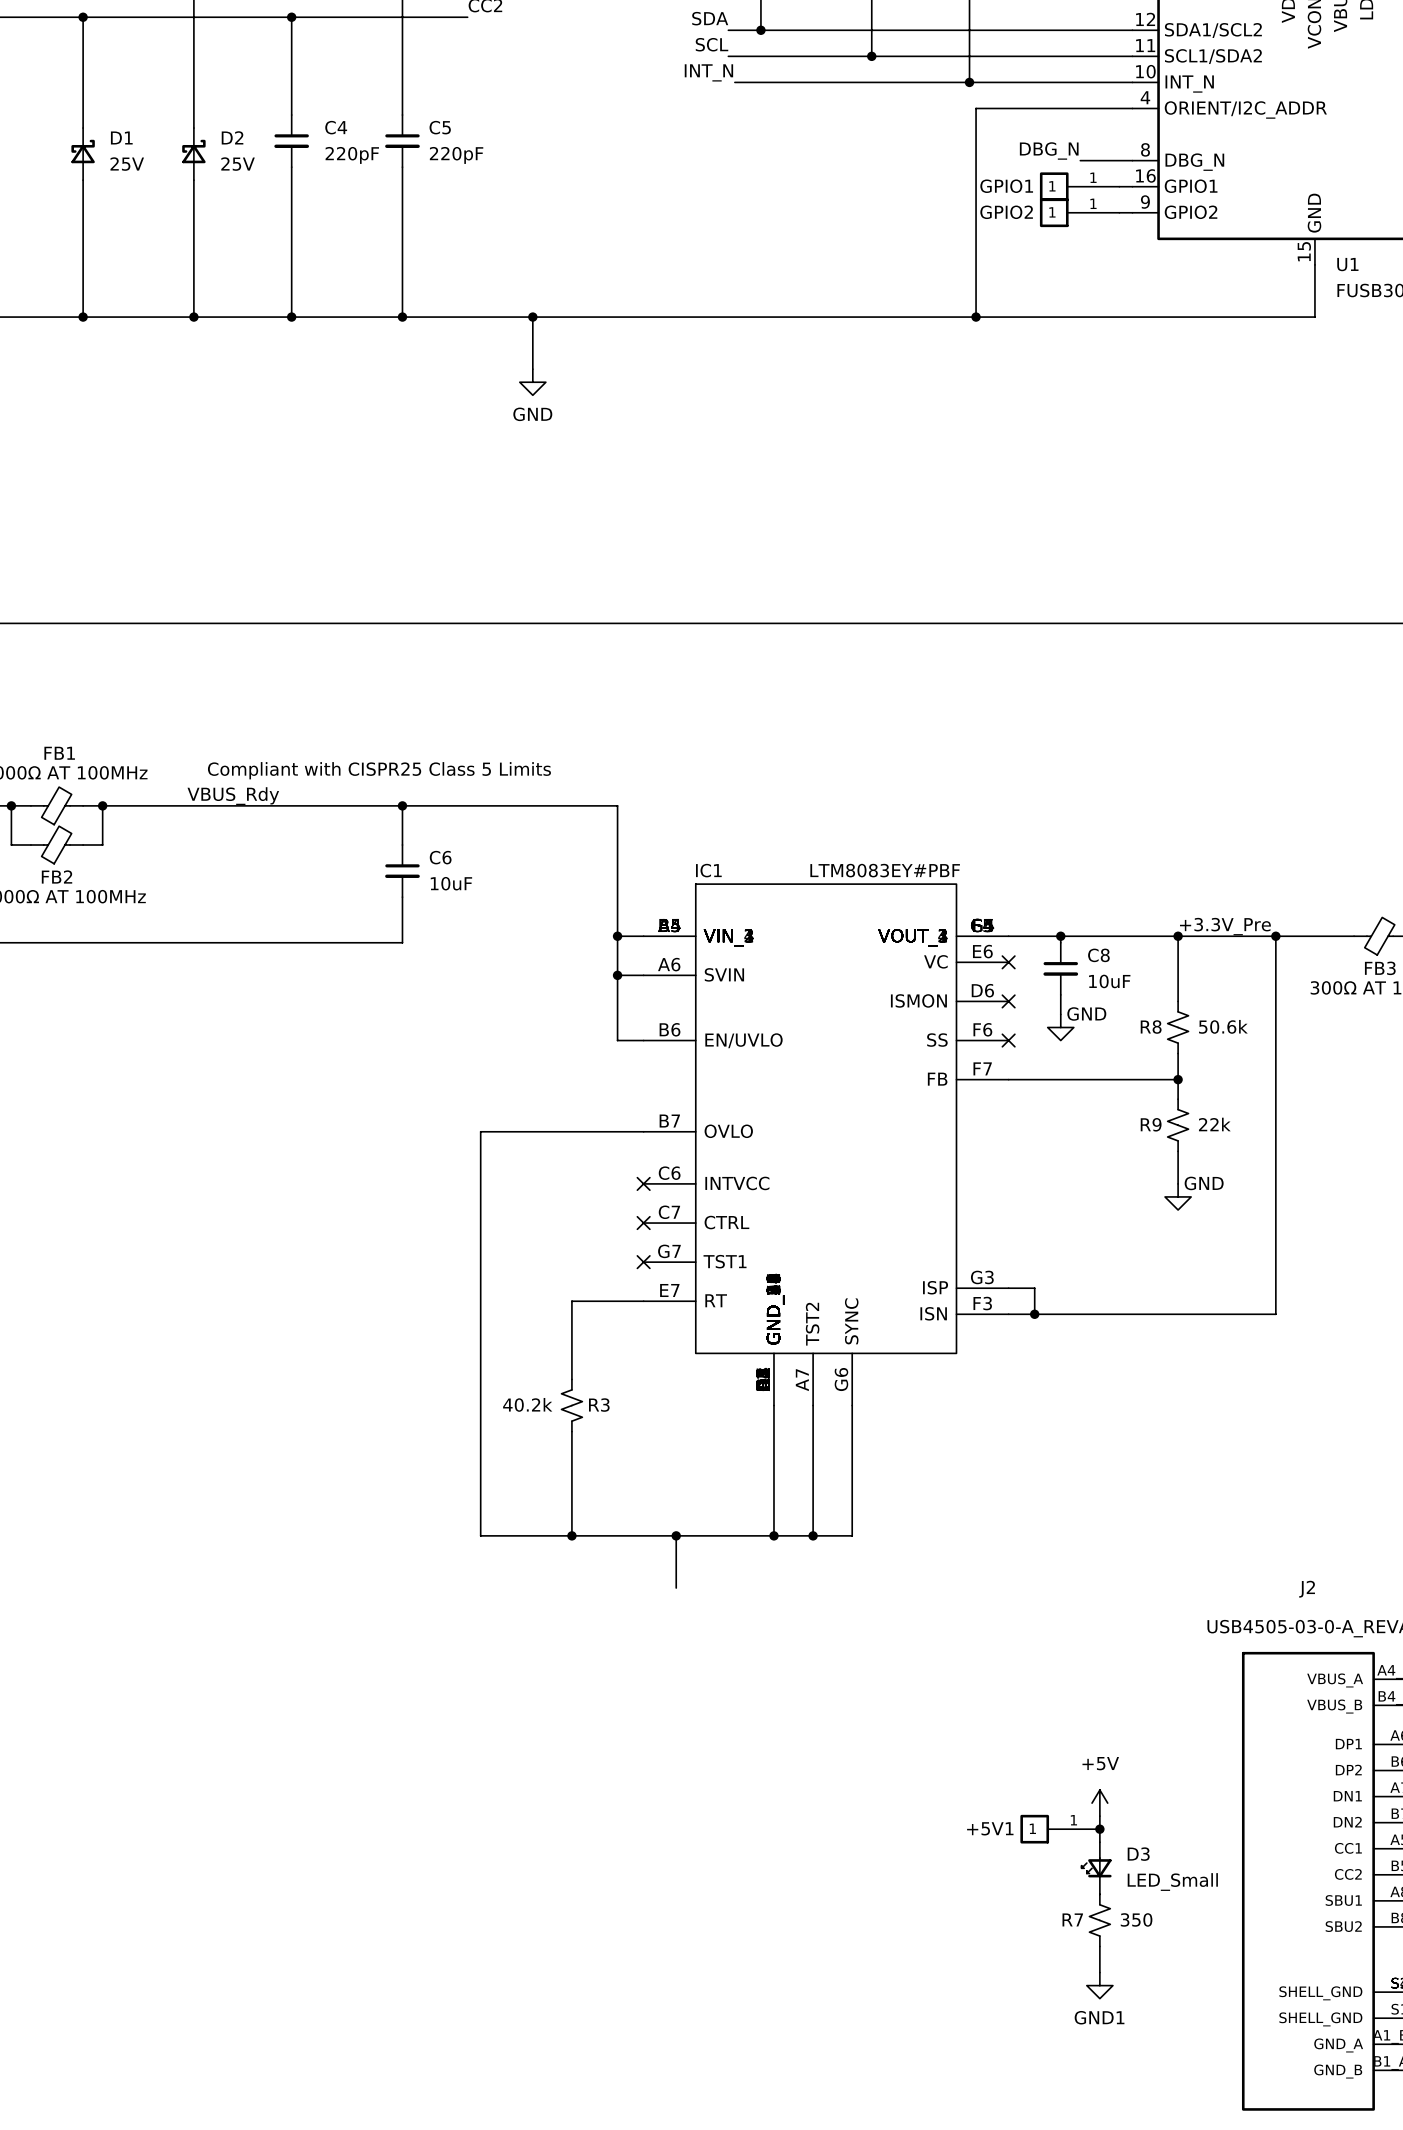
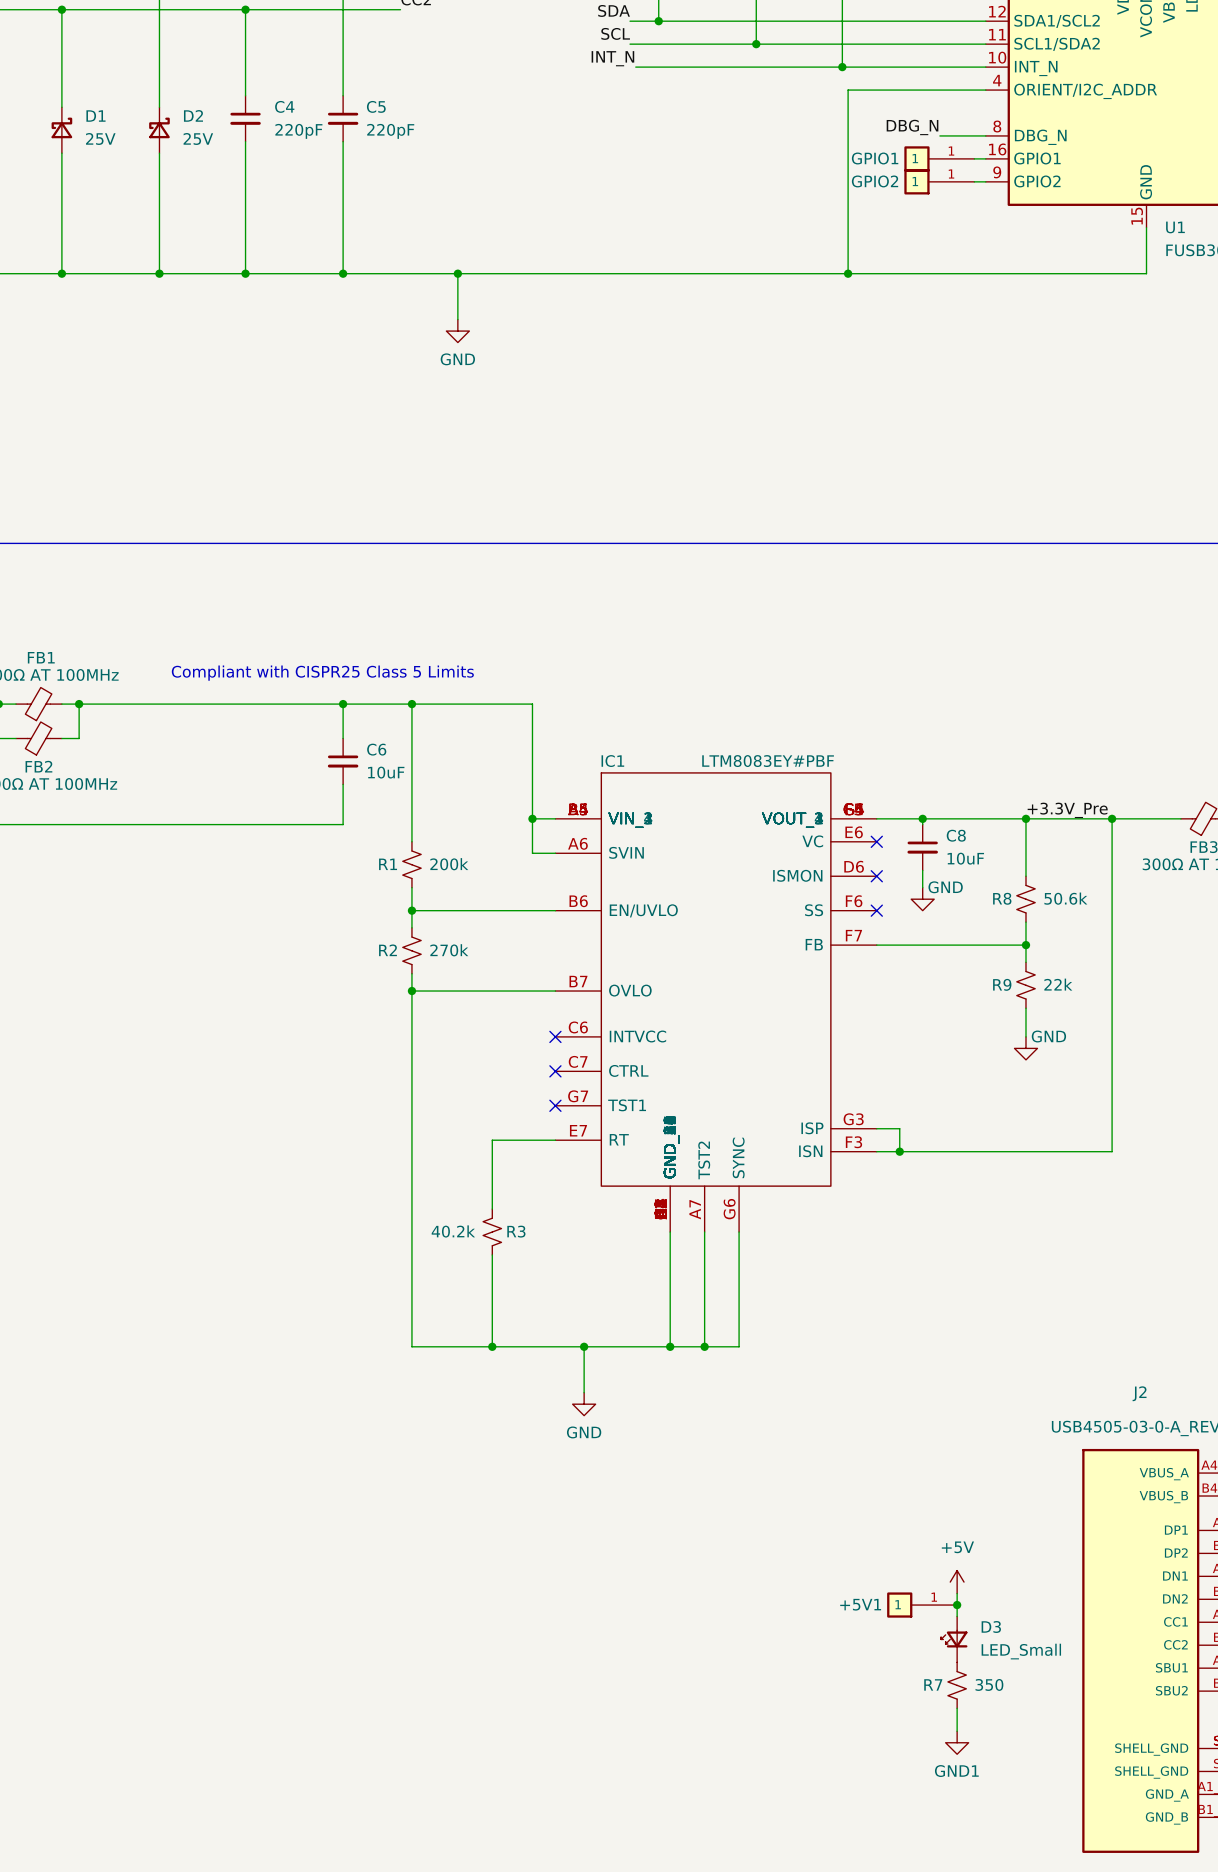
label: VBUS_Rdy (233, 796) -> none
wire: none -> (411, 704) (411, 841)
junction: none -> (411, 704)
wire: (617, 975) (617, 1040) -> (411, 910) (532, 910)
junction: (617, 975) -> none
R1: none -> 200k (411, 864)
wire: none -> (411, 887) (411, 927)
junction: none -> (411, 910)
R2: none -> 270k (411, 950)
wire: none -> (411, 973) (411, 991)
junction: none -> (411, 991)
power symbol: none -> GND (584, 1404)

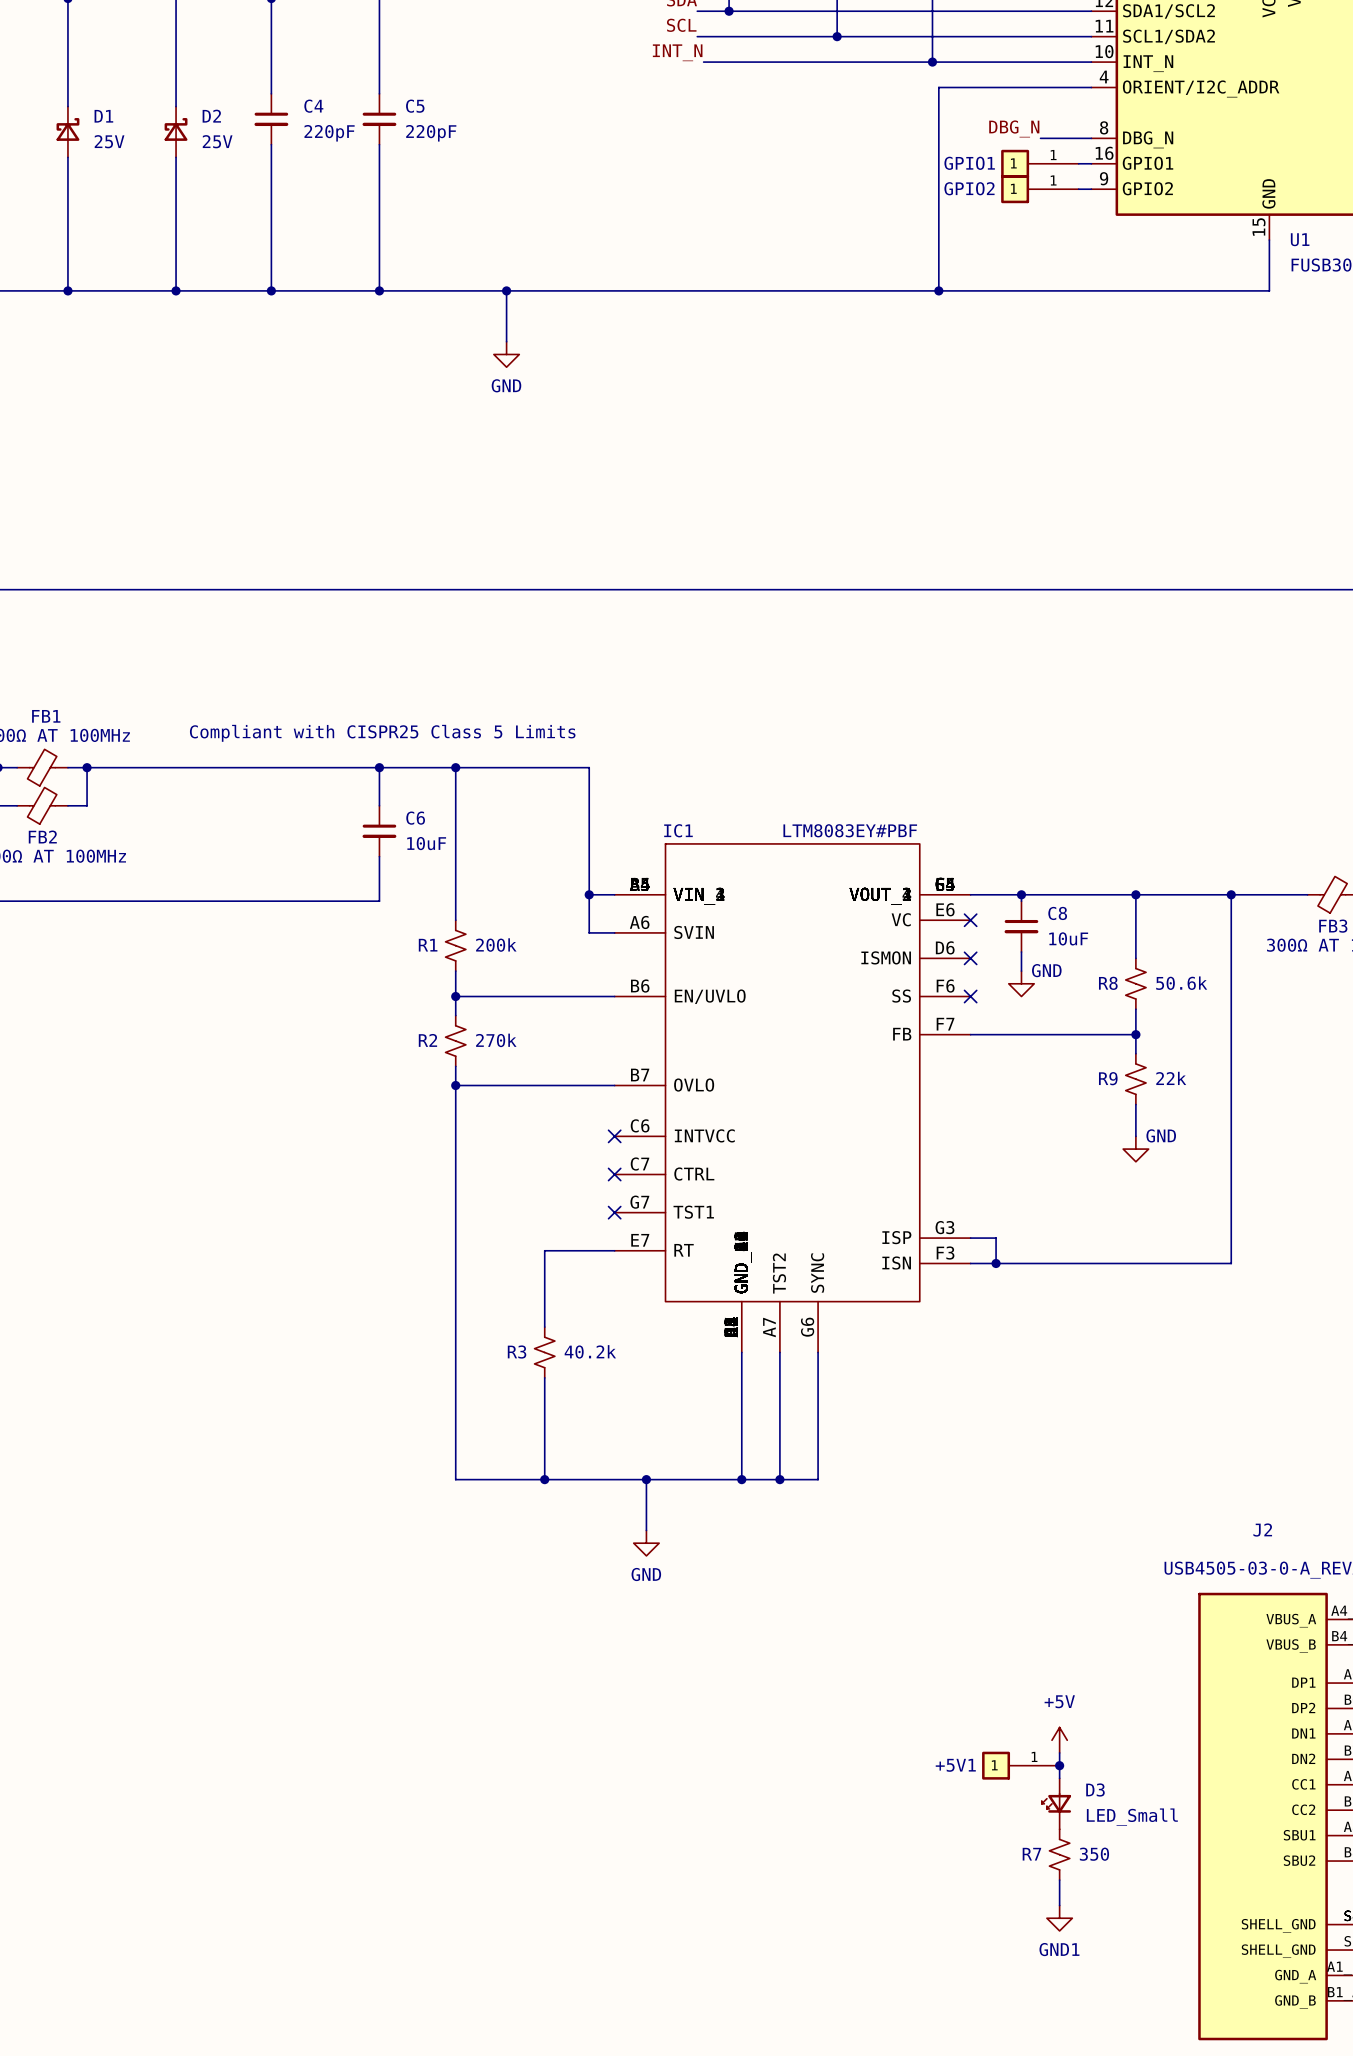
label: +3.3V_Pre (1067, 810) -> none
R3 flip: as is (492, 1232) -> left-right (544, 1352)

